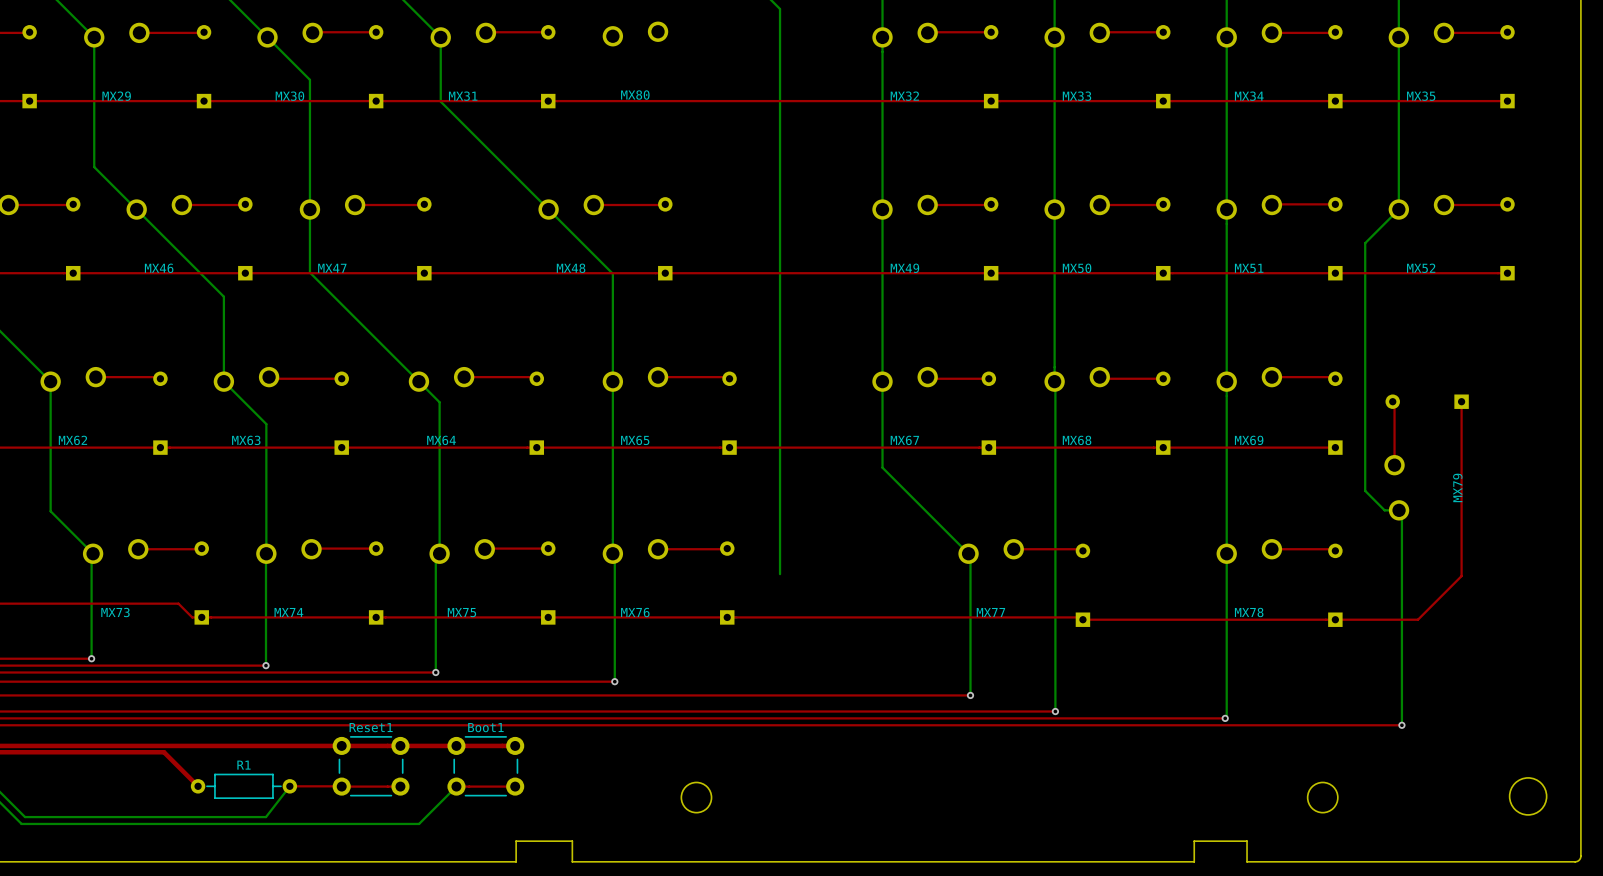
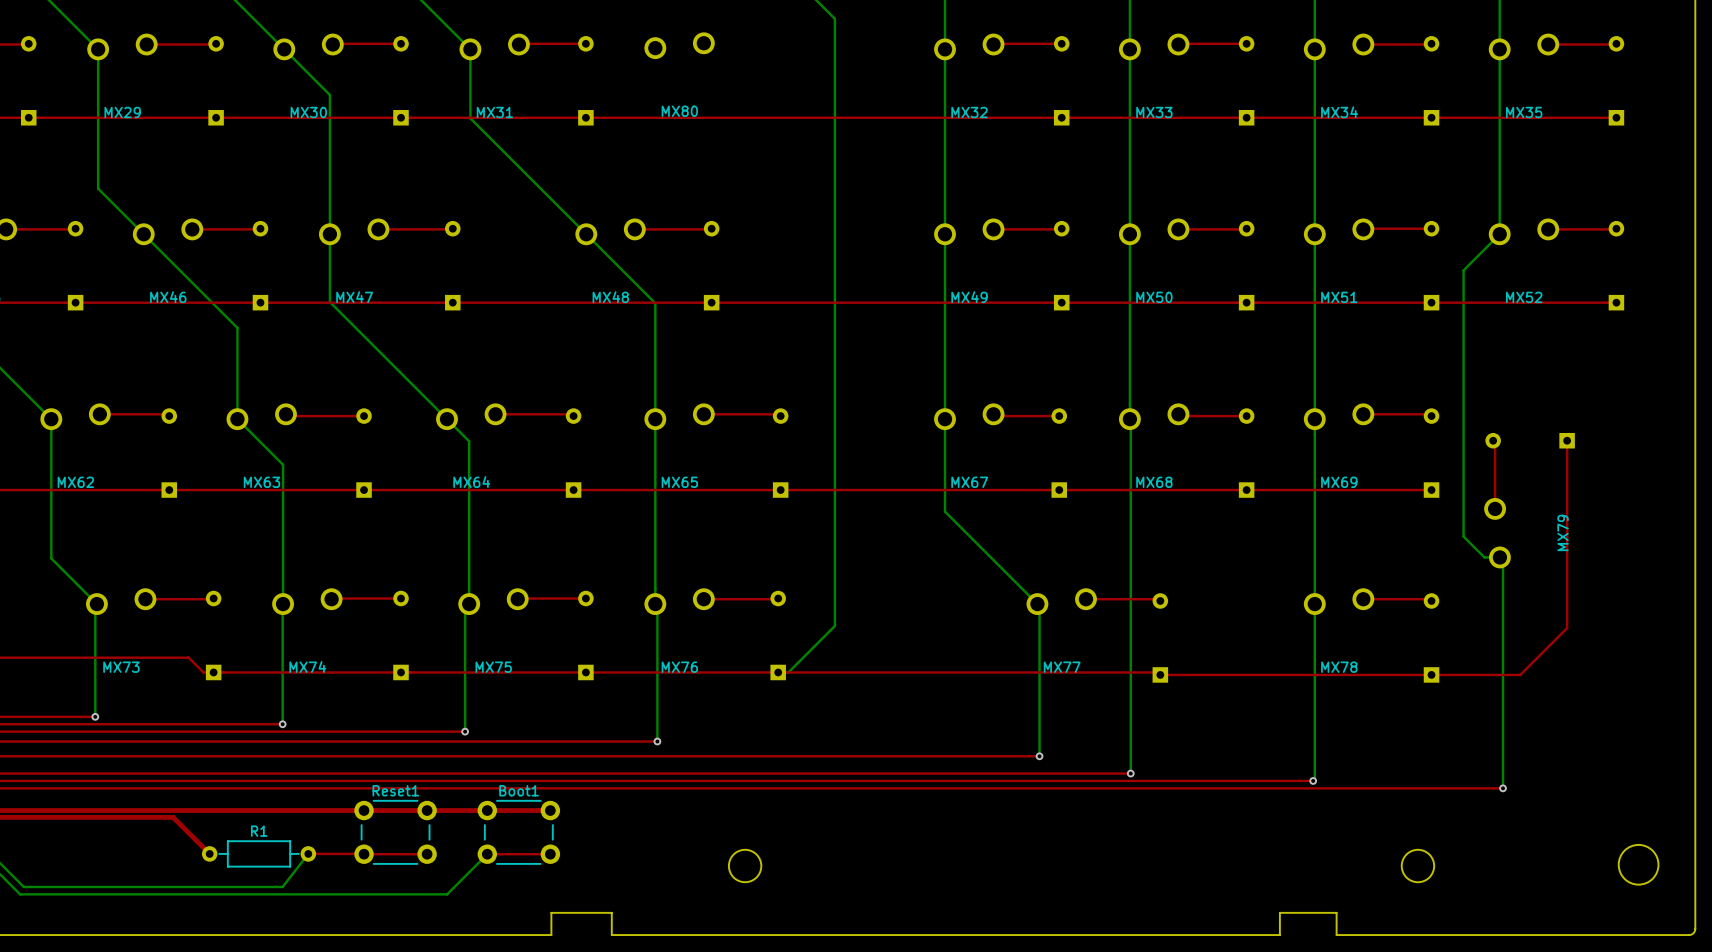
bottom track: none -> (834, 625) (788, 672)

